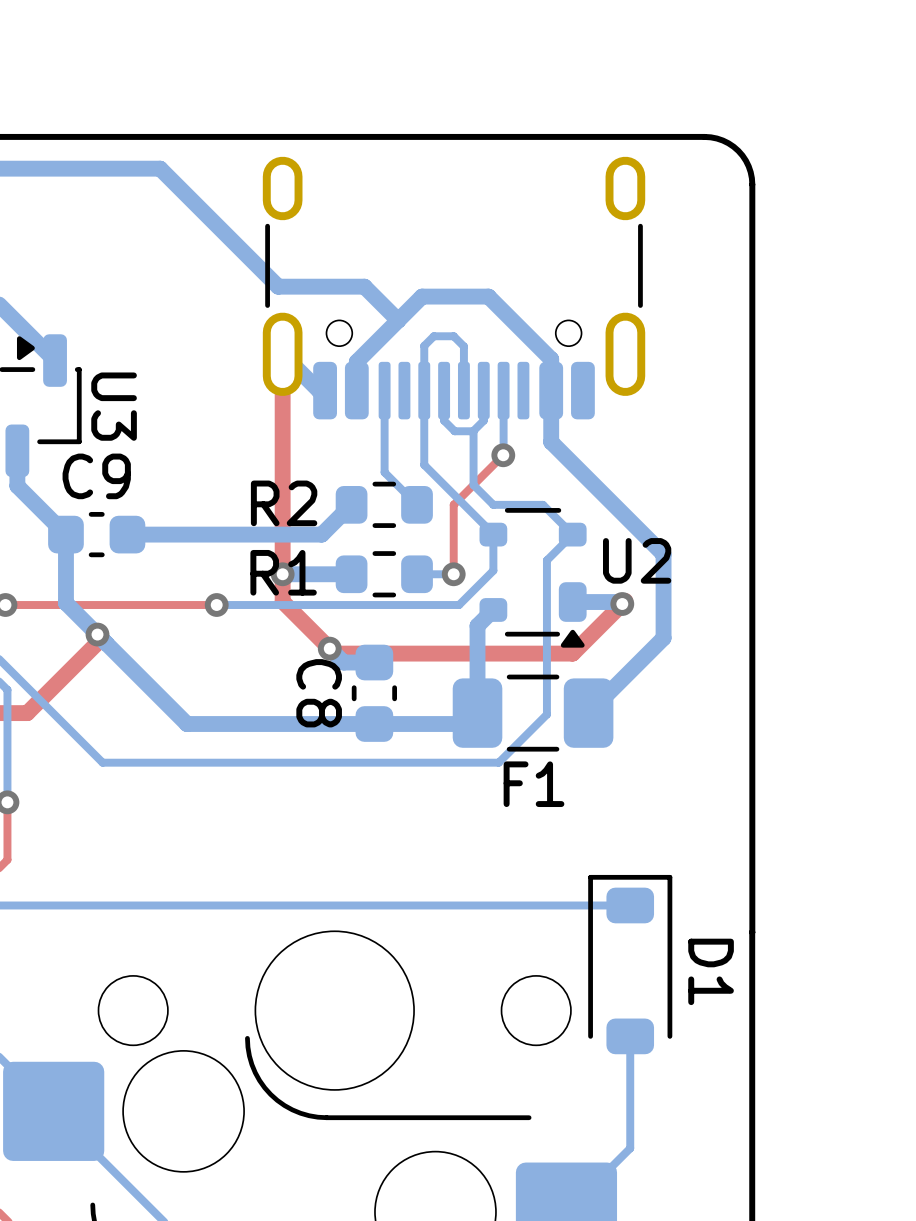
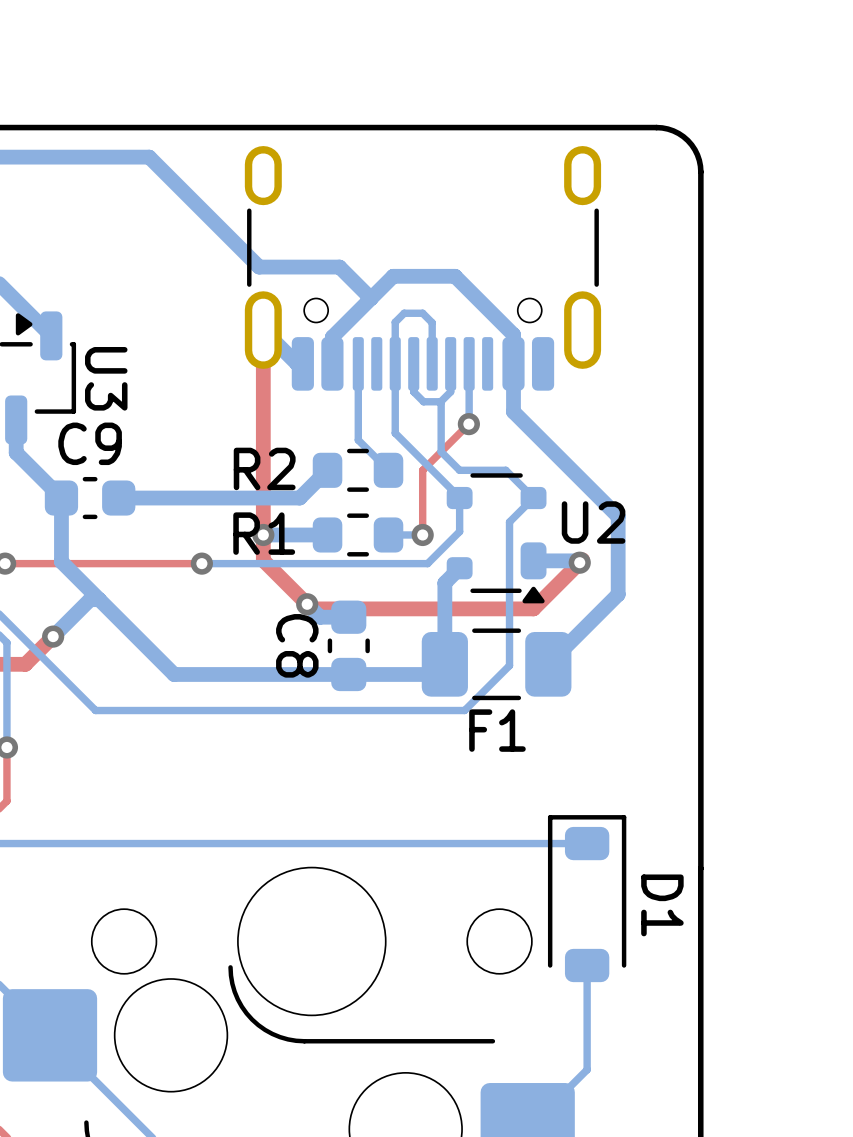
top track: (97, 634) (97, 642) (57, 683) -> none
via: (97, 634) -> none
bottom track: none -> (99, 599) (90, 599) (53, 636)
via: none -> (53, 636)

